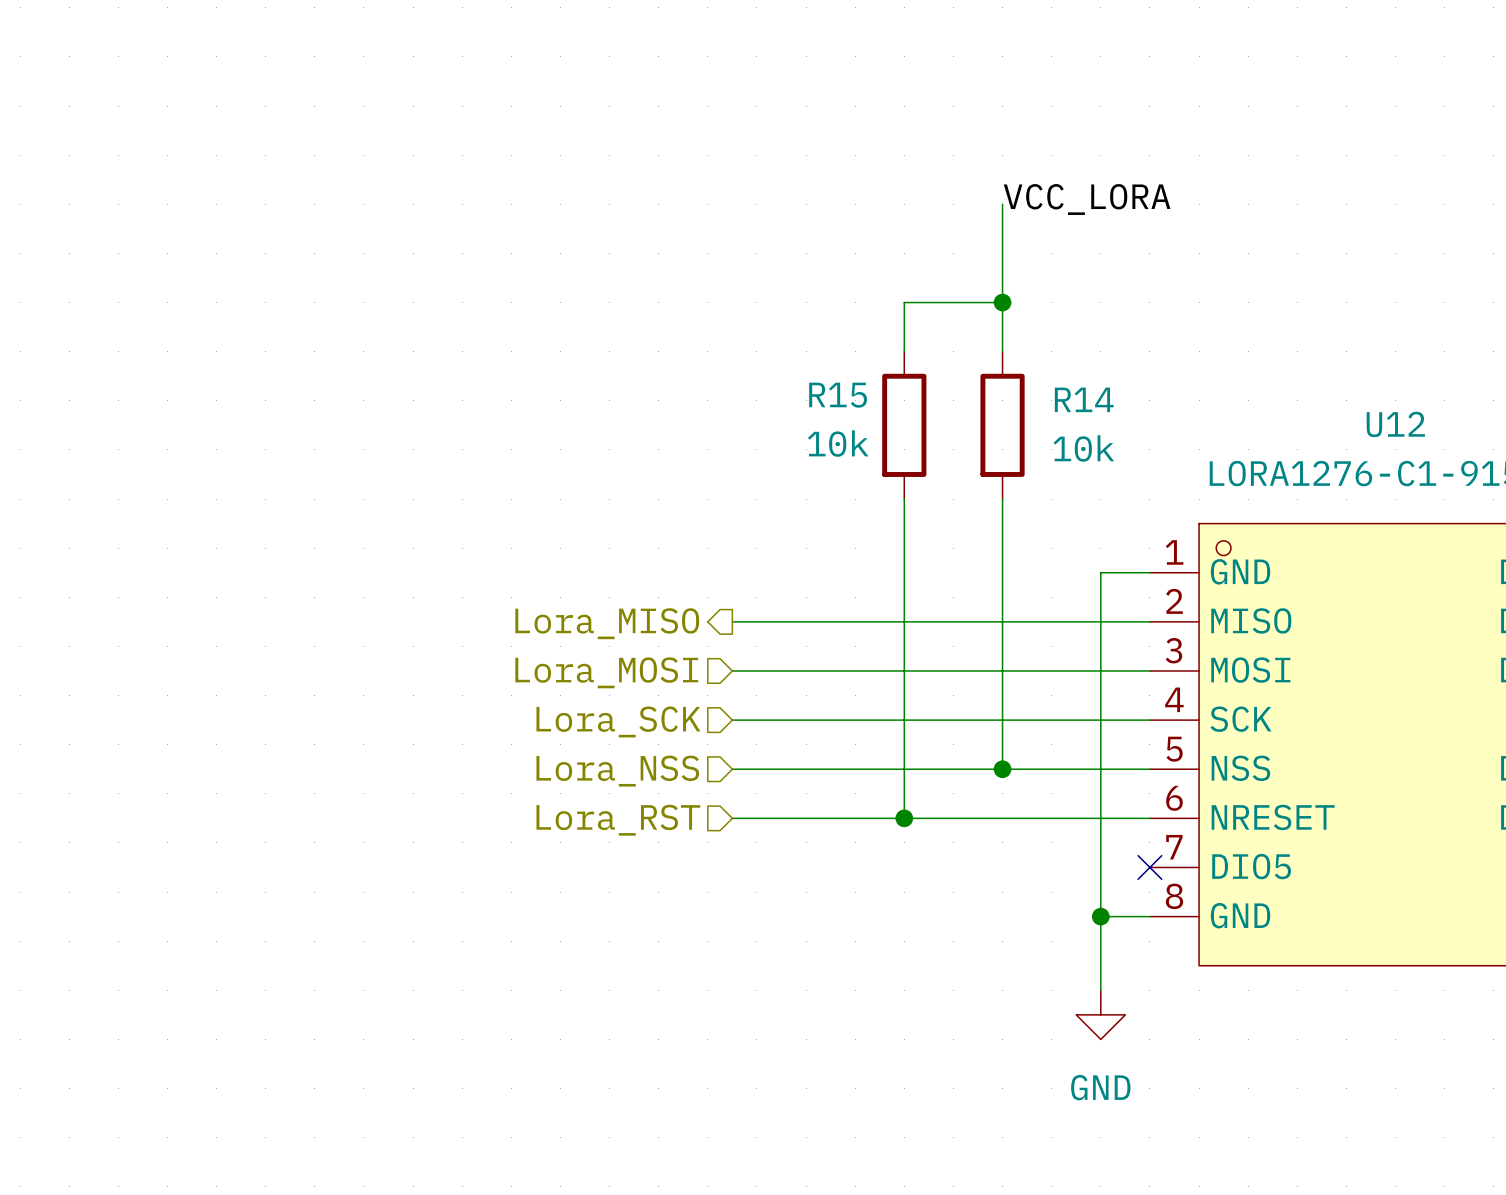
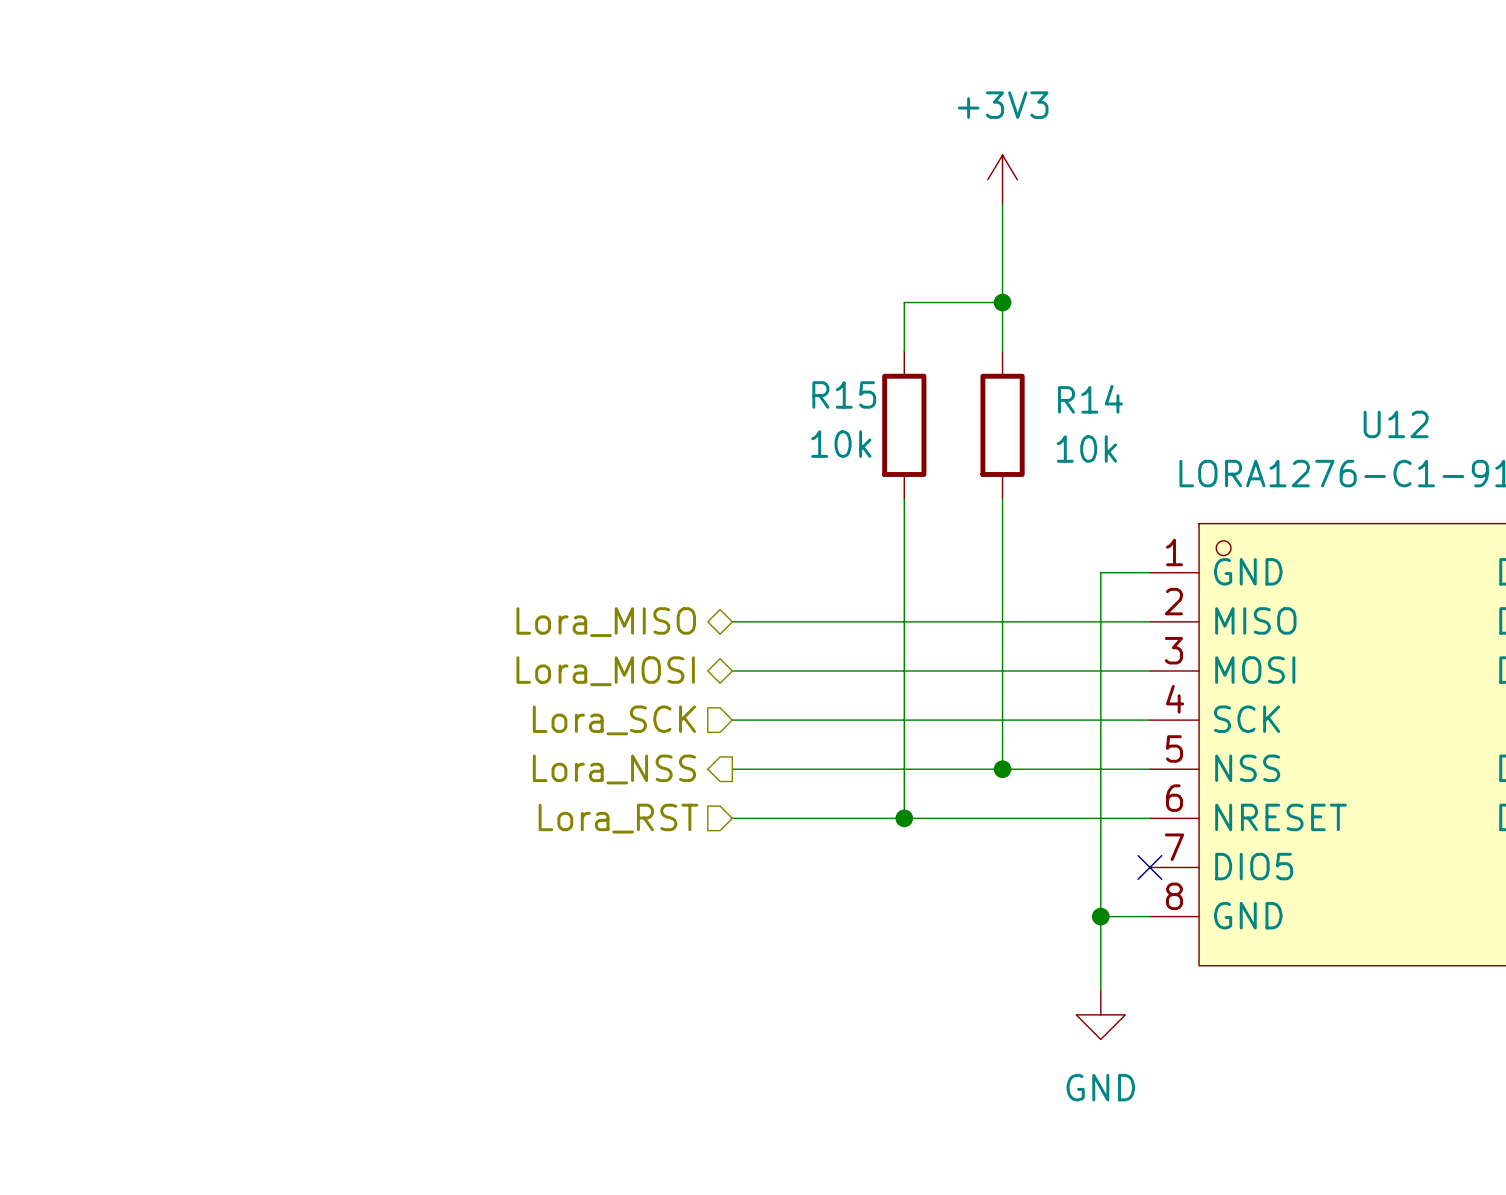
power symbol: none -> +3V3 (1002, 179)
label: VCC_LORA (1087, 199) -> none
hierarchical label shape: output (607, 623) -> bidirectional (606, 622)
hierarchical label shape: input (606, 672) -> bidirectional (605, 671)
hierarchical label shape: input (617, 771) -> output (614, 769)

